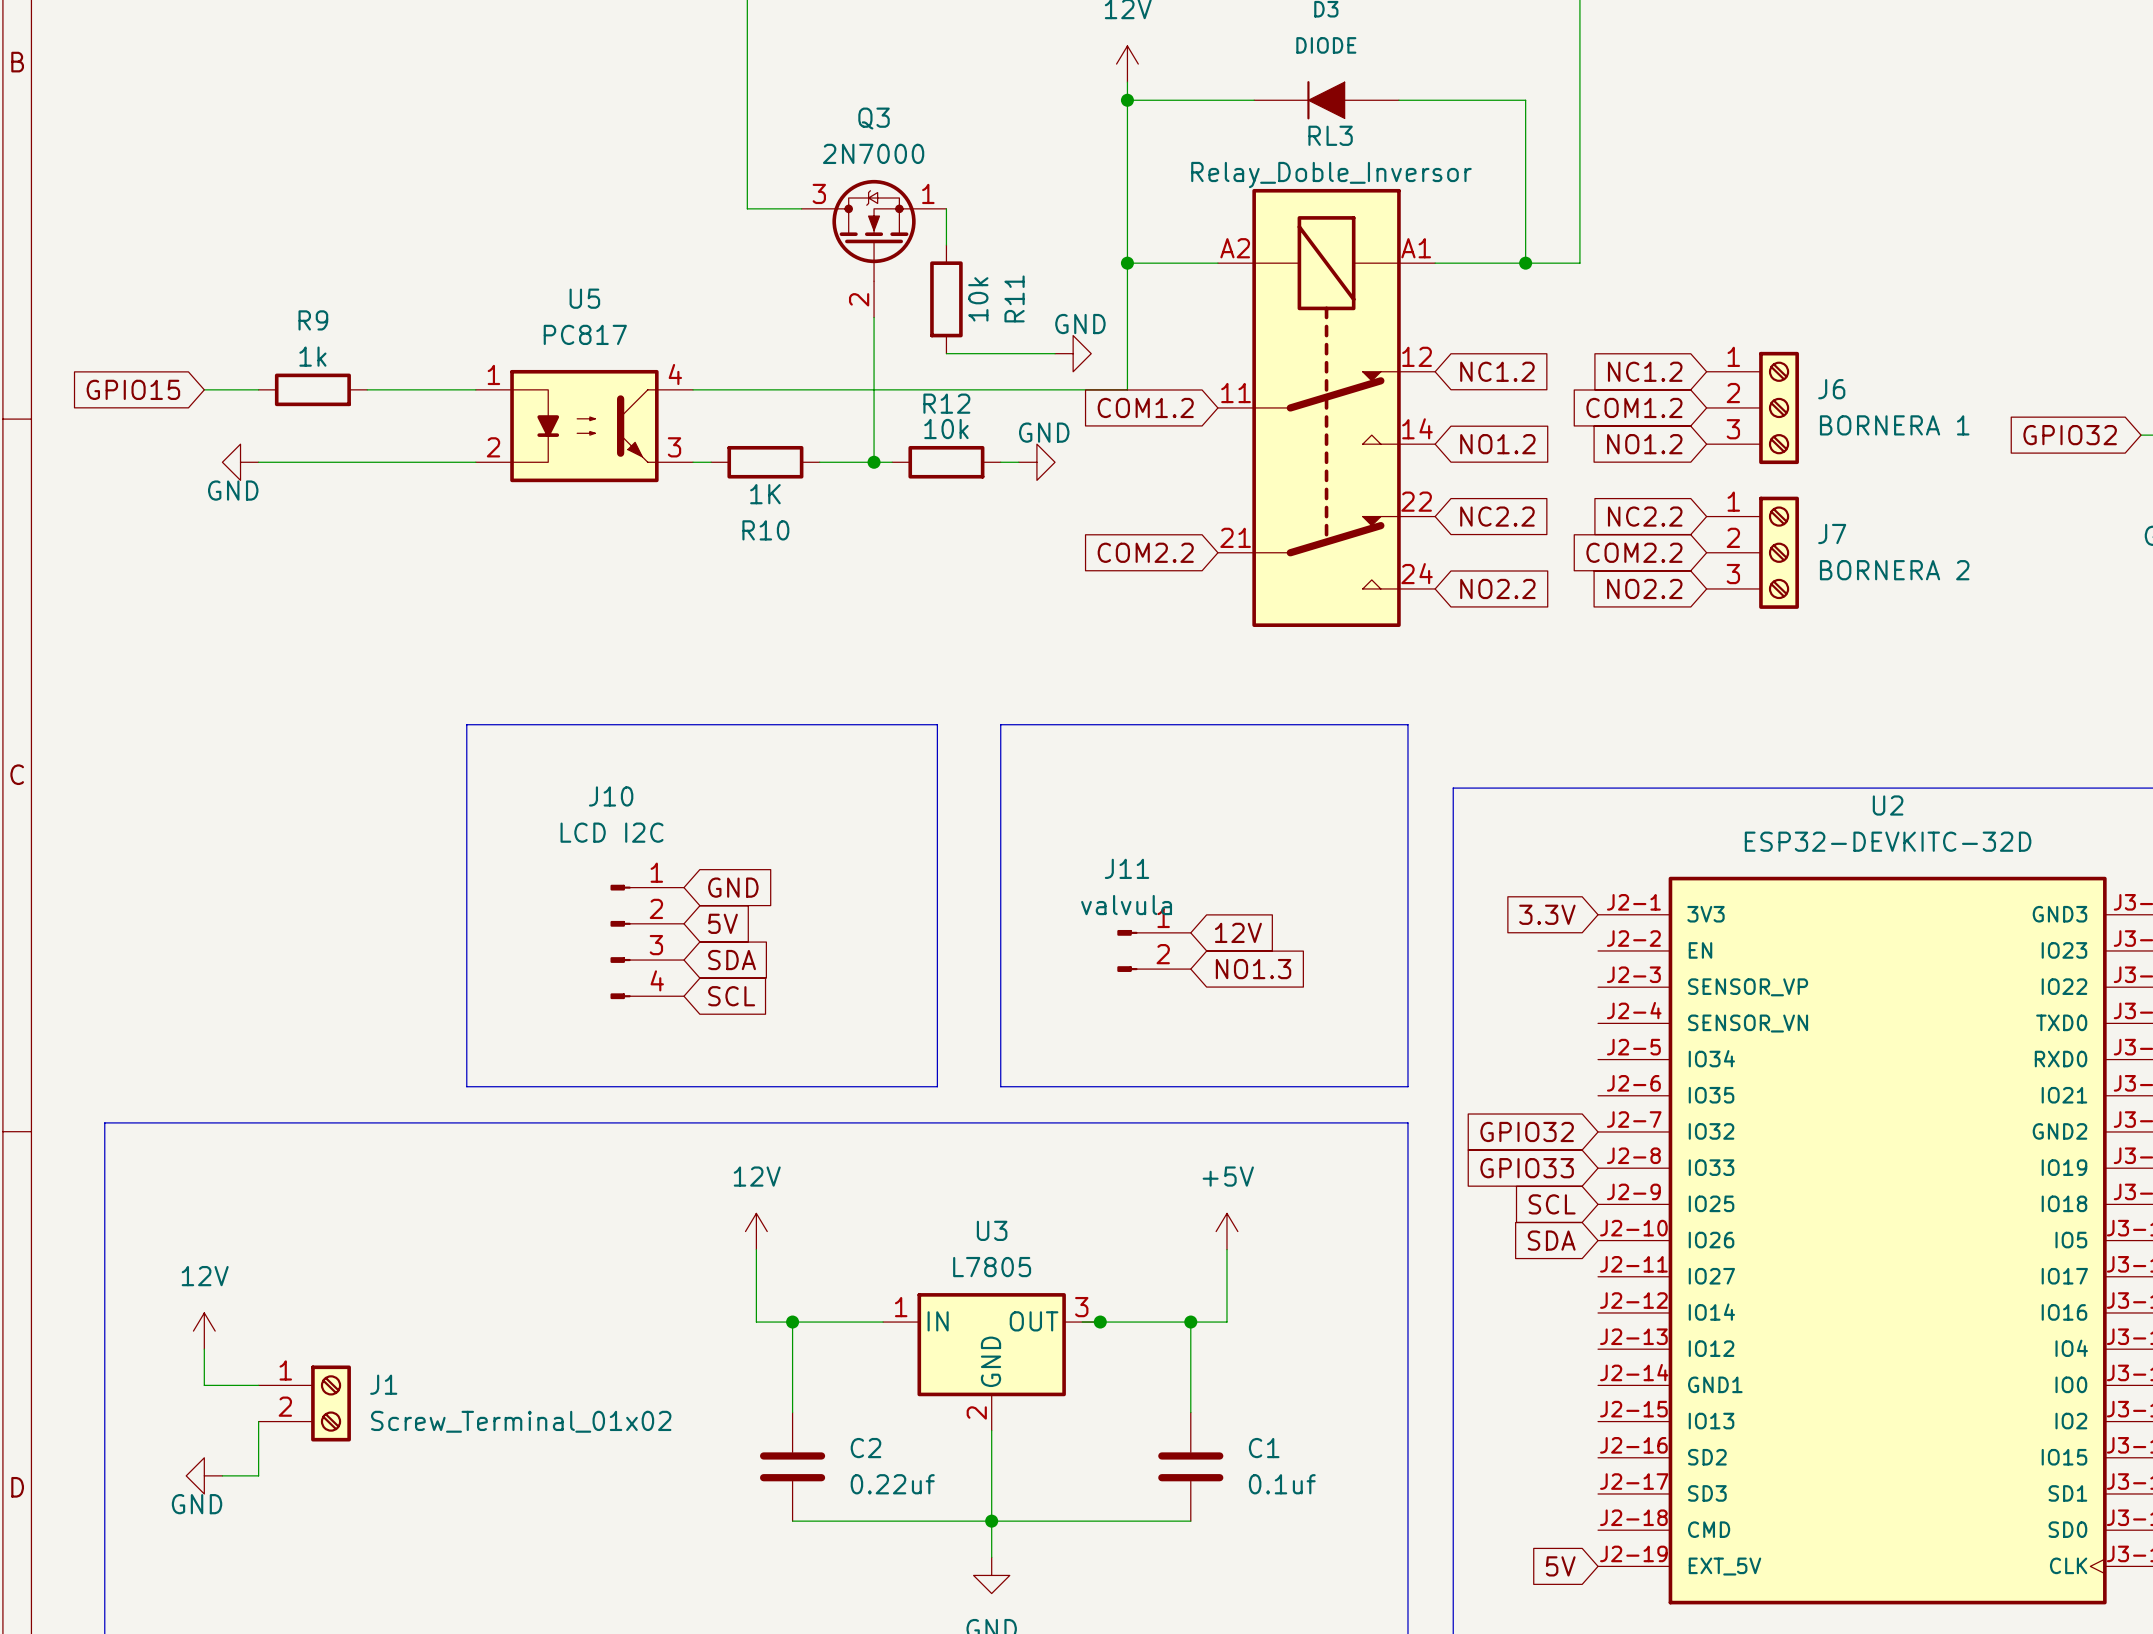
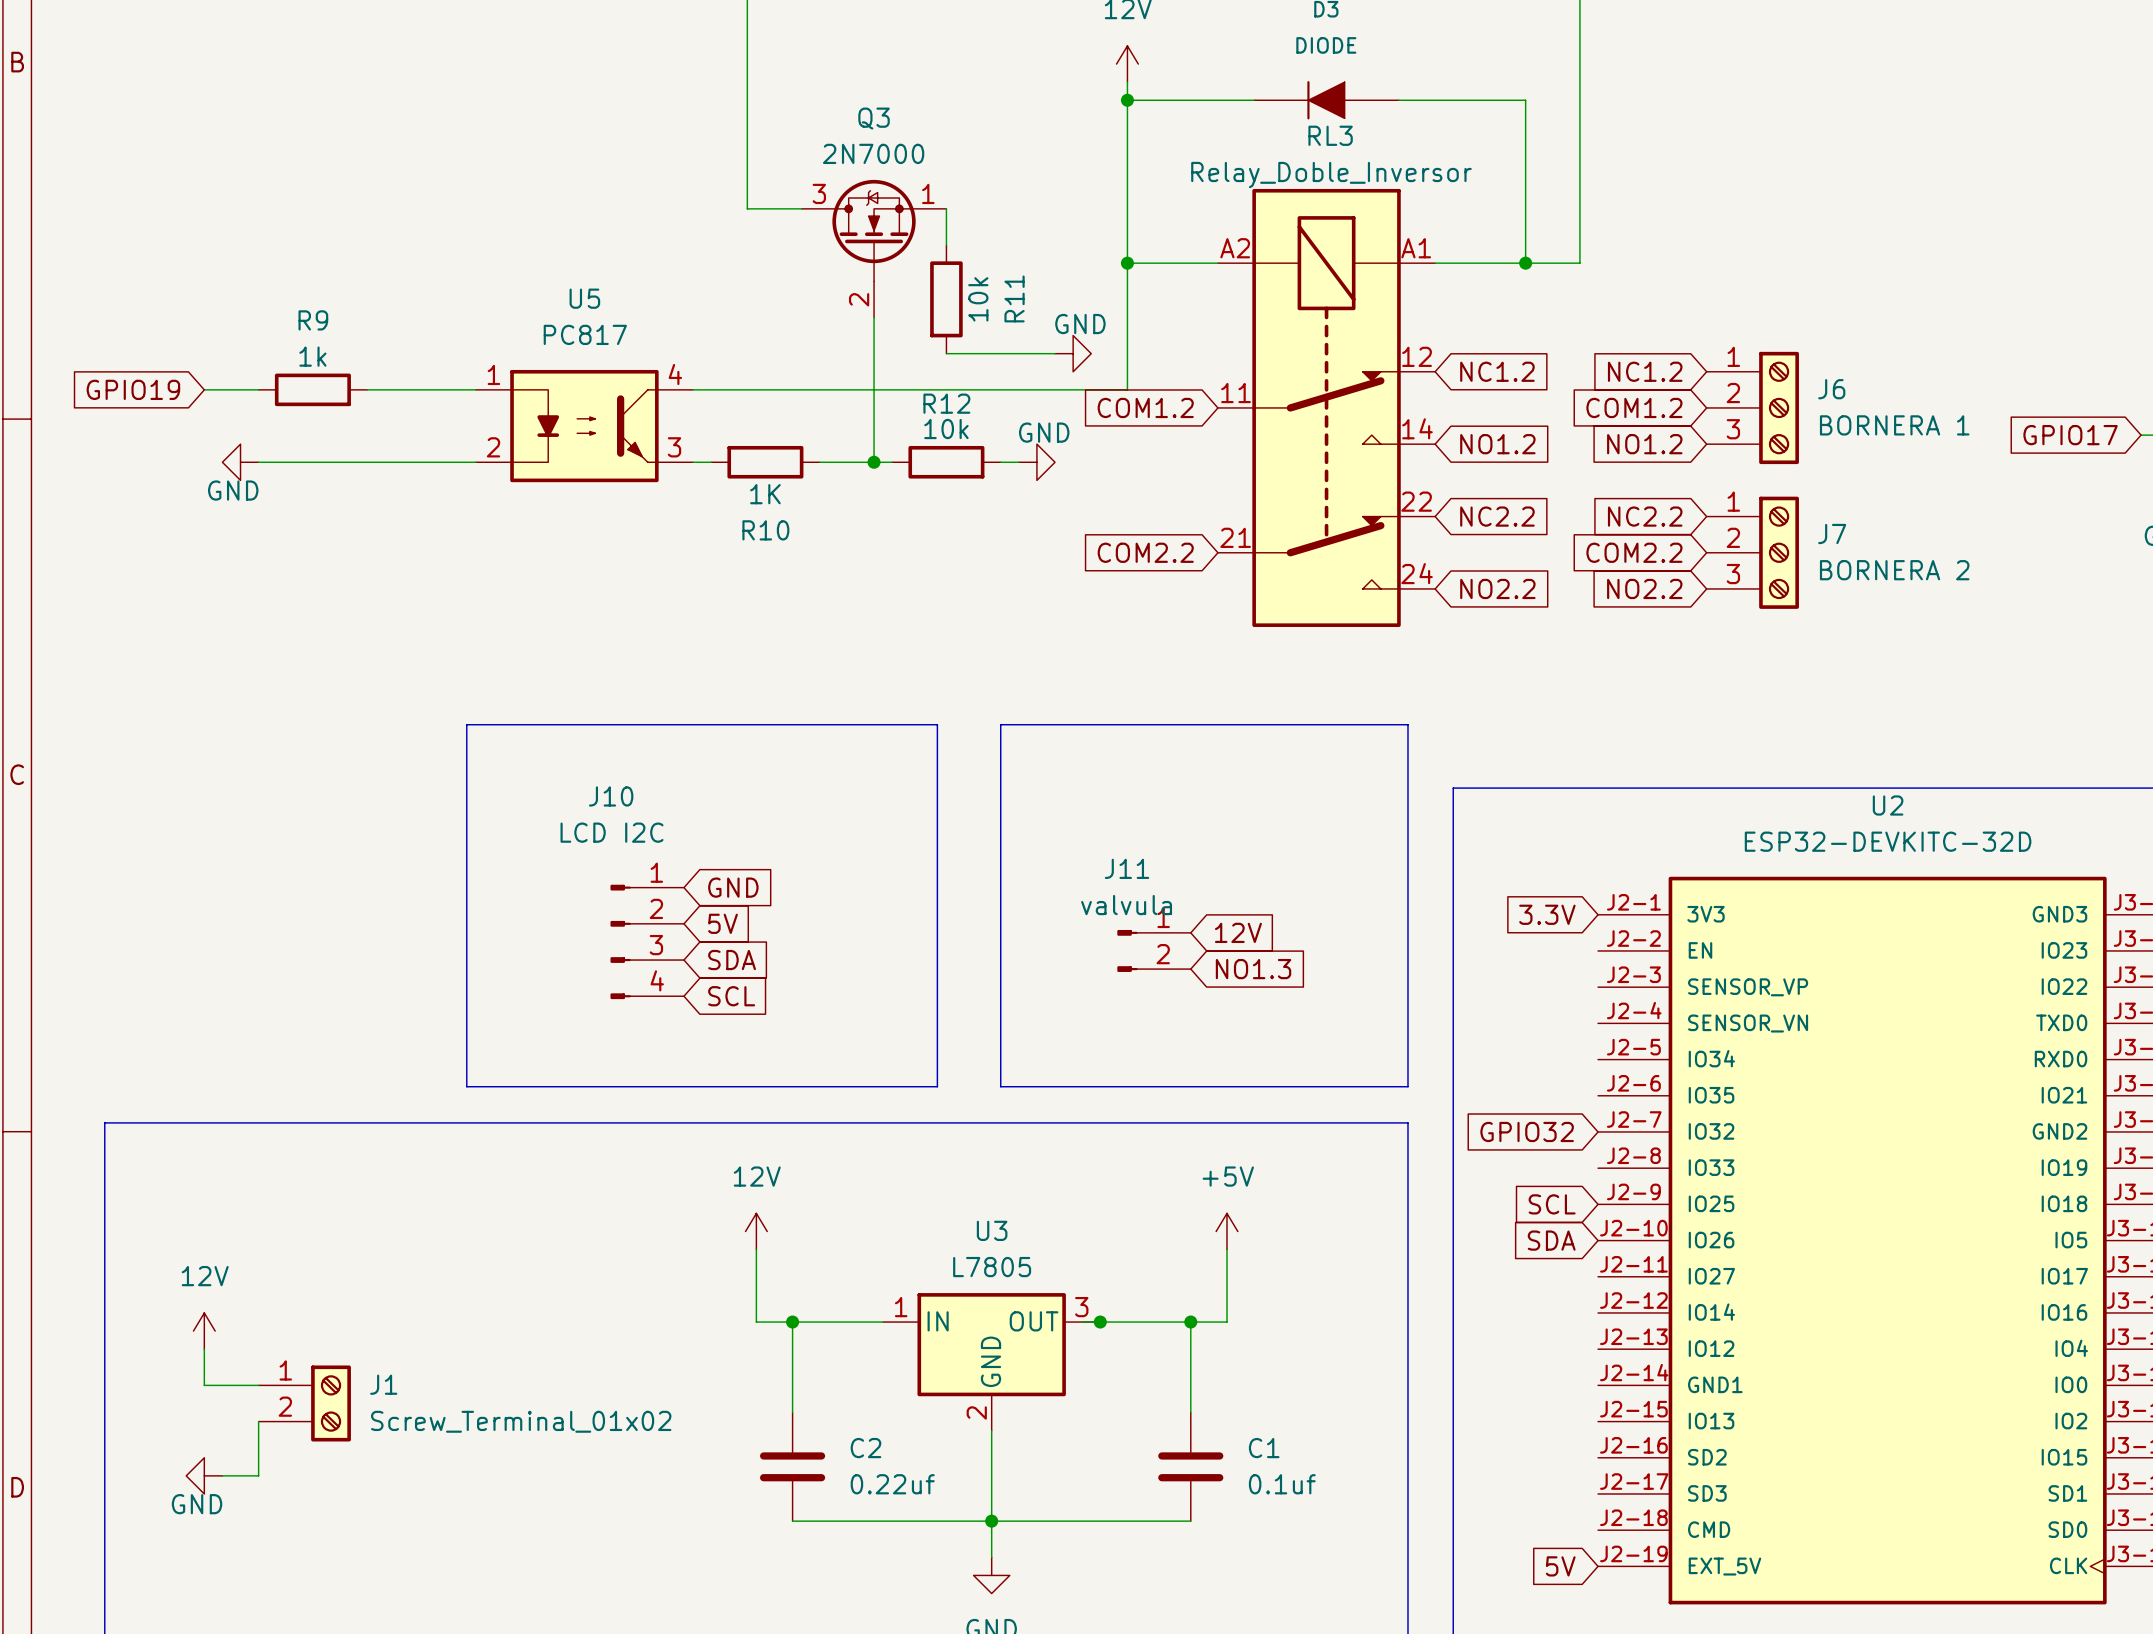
global label: GPIO15 (133, 389) -> GPIO19 (133, 389)
global label: GPIO32 (2070, 435) -> GPIO17 (2070, 435)
global label: GPIO33 (1527, 1168) -> none

